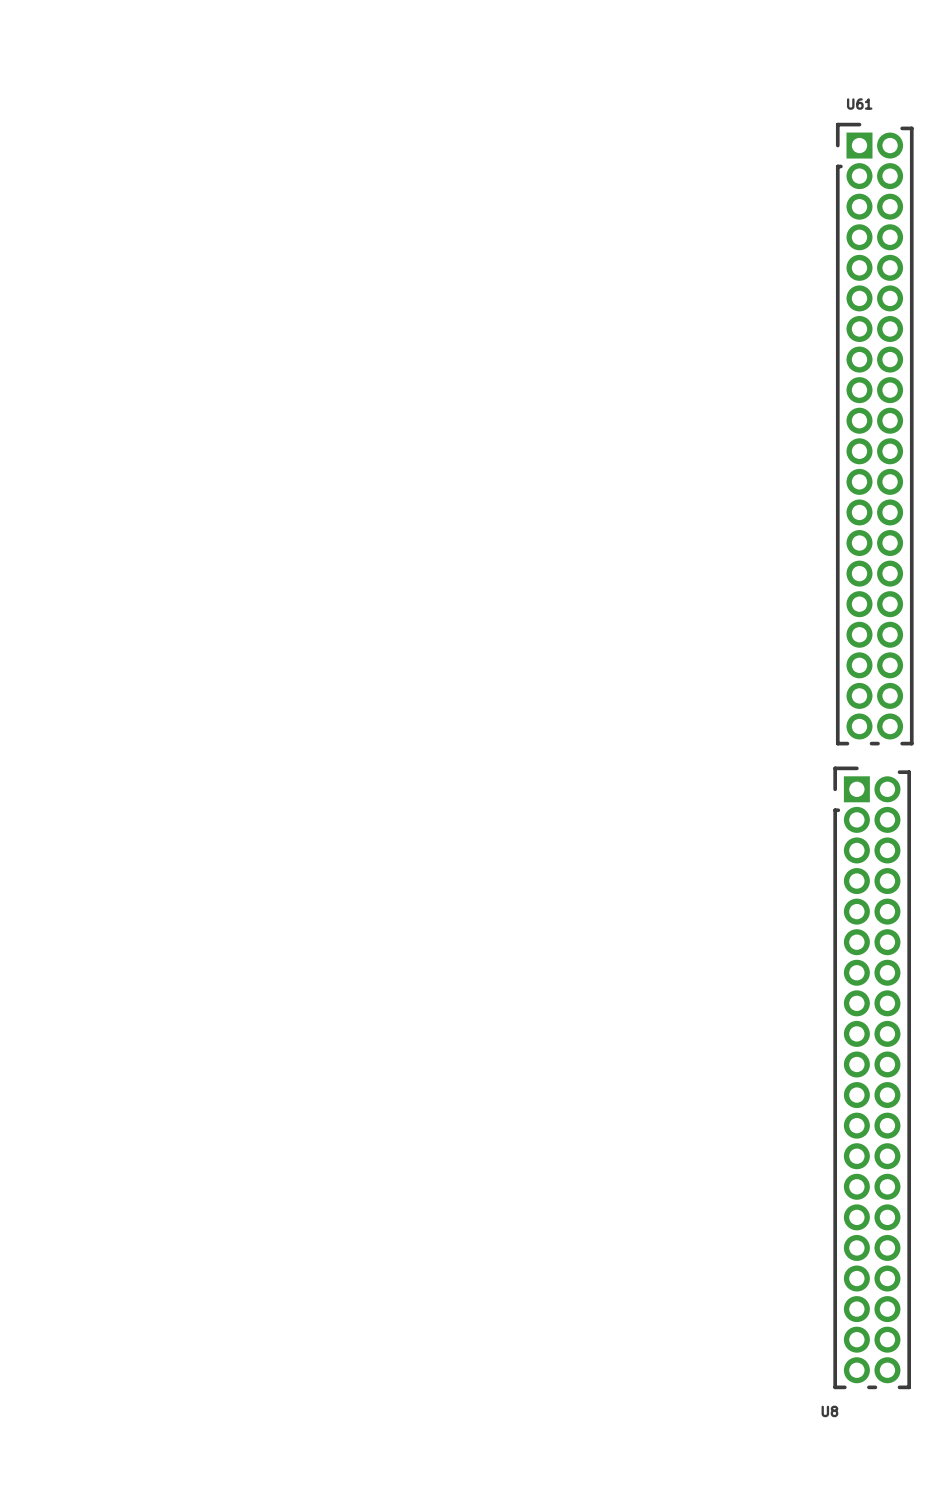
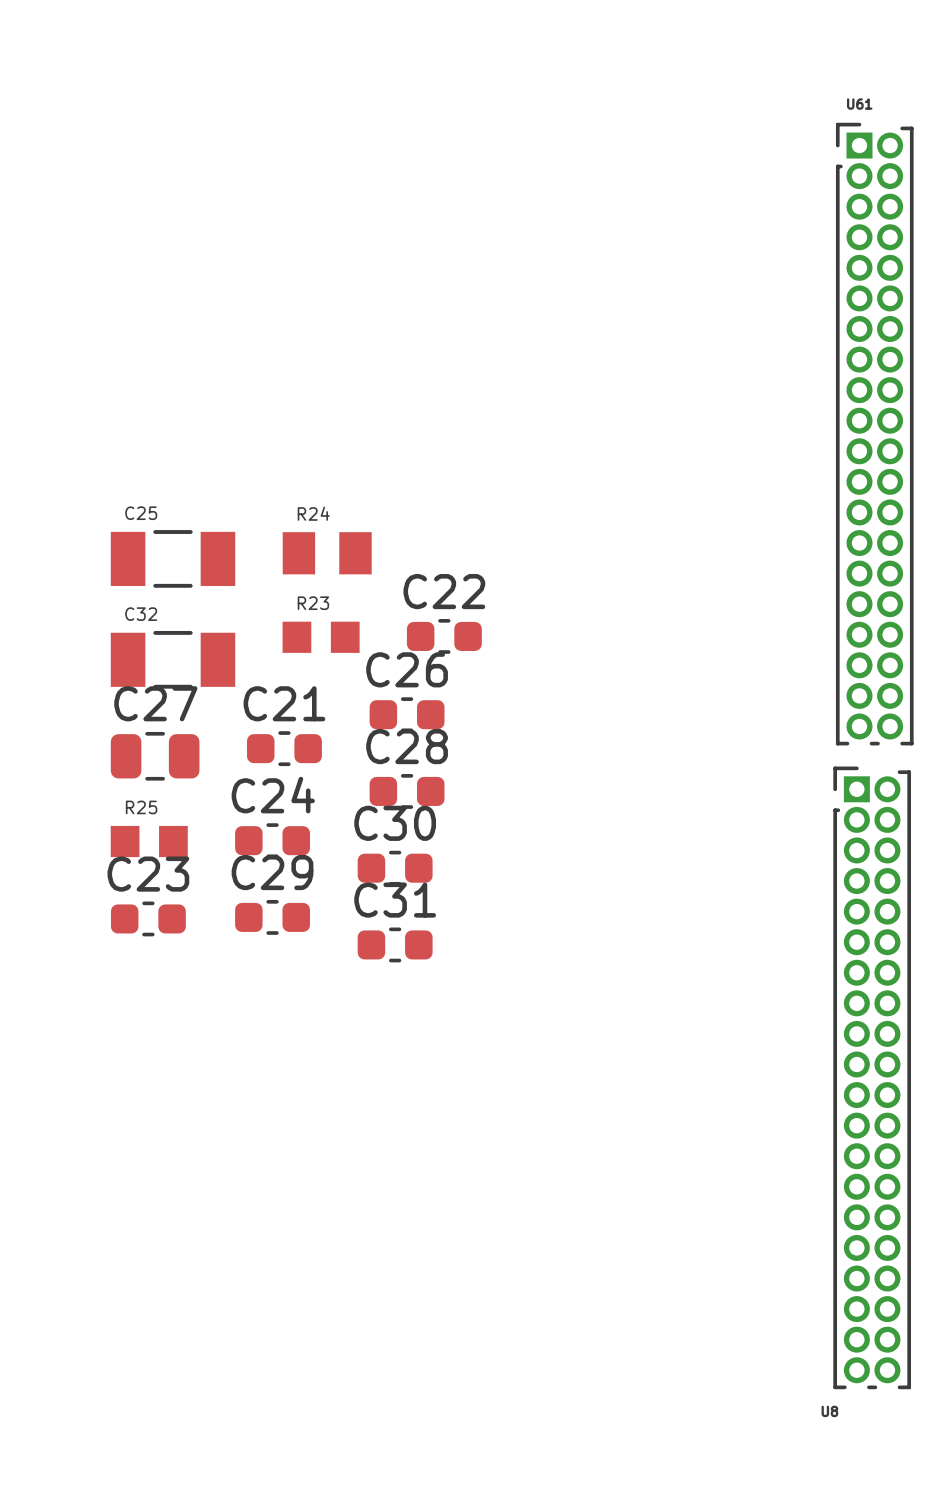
R24: none -> (327, 553)
C25: none -> (173, 558)
C22: none -> (444, 636)
R23: none -> (321, 637)
C32: none -> (173, 659)
C26: none -> (407, 714)
C21: none -> (284, 748)
C27: none -> (155, 756)
C28: none -> (407, 791)
C24: none -> (272, 840)
R25: none -> (149, 841)
C30: none -> (395, 868)
C29: none -> (272, 917)
C23: none -> (148, 918)
C31: none -> (395, 944)

